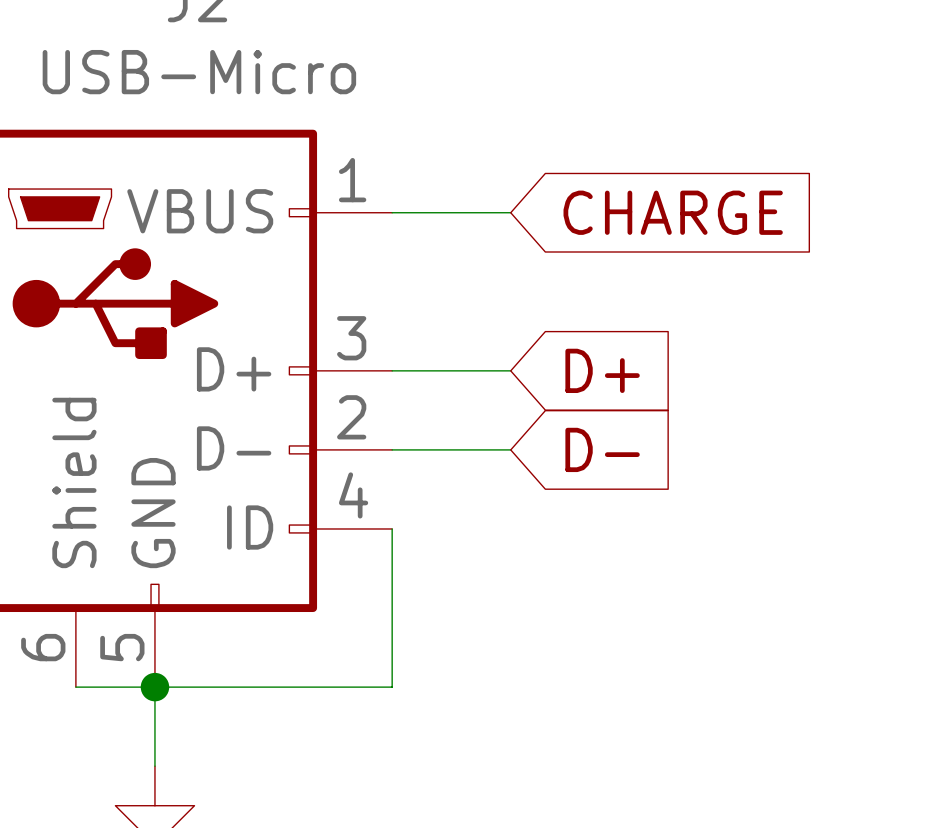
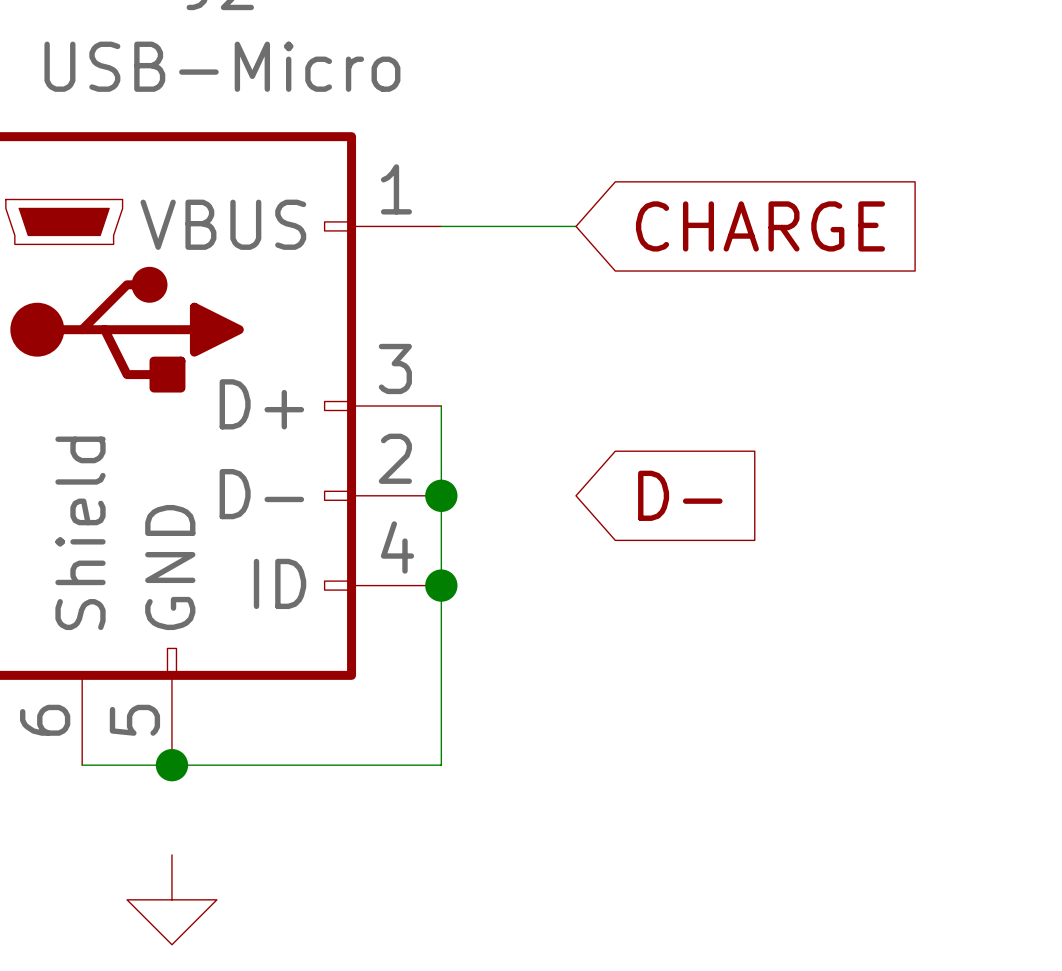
wire: (392, 370) (510, 370) -> (441, 406) (441, 585)
global label: D+ (602, 370) -> none
wire: (392, 449) (510, 449) -> none
junction: none -> (441, 495)
junction: none -> (441, 585)
wire: (154, 687) (154, 766) -> none

